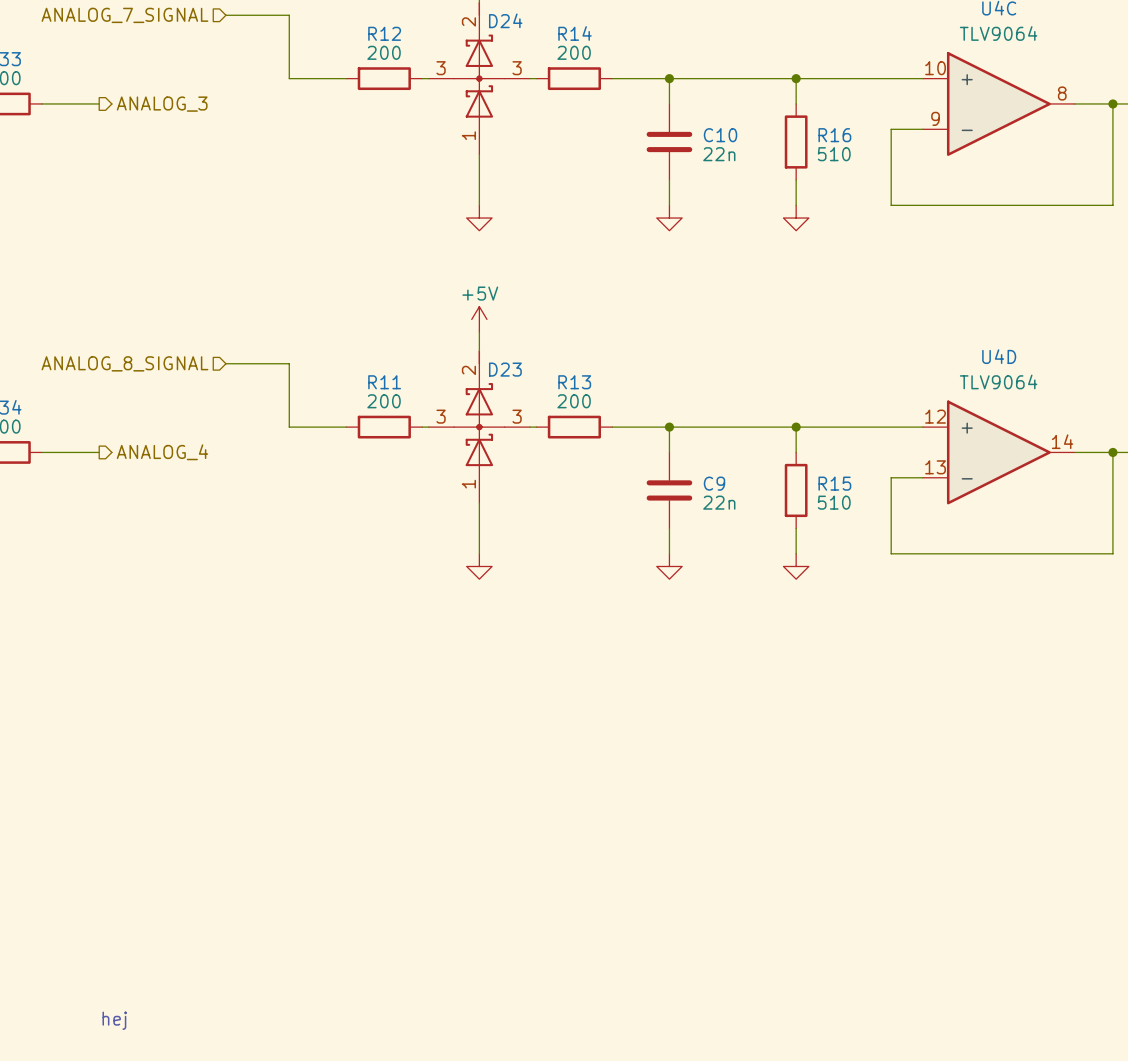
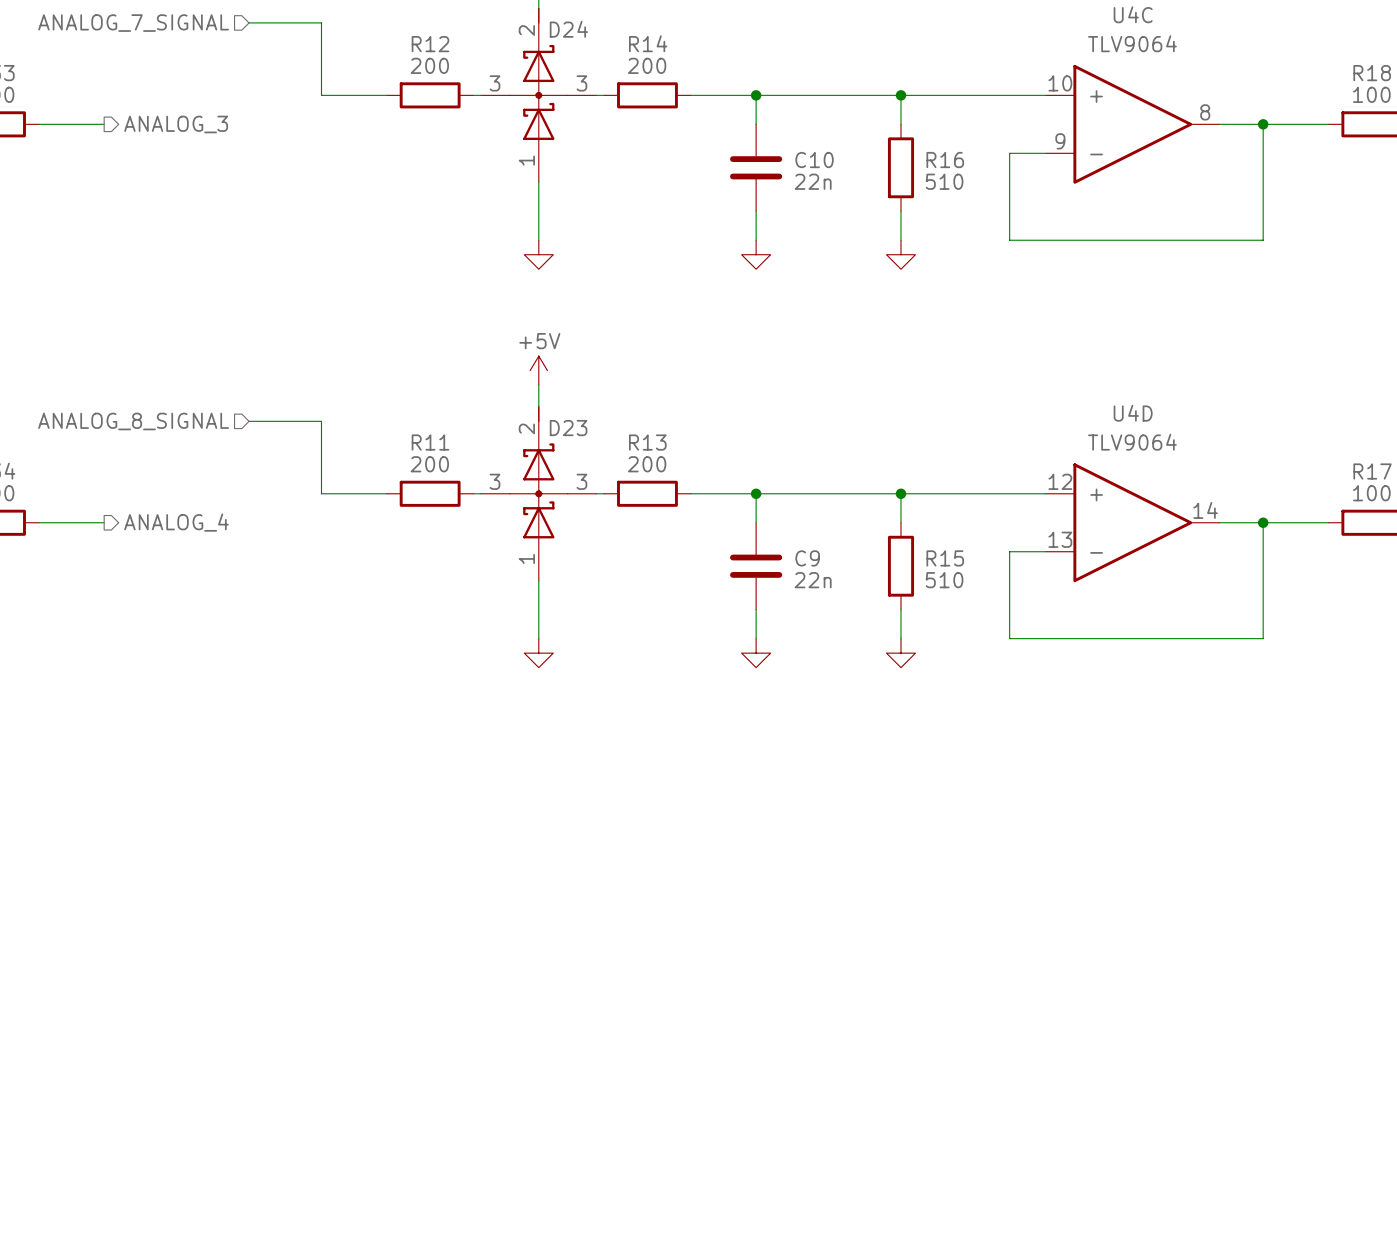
text: hej (114, 1020) -> none

